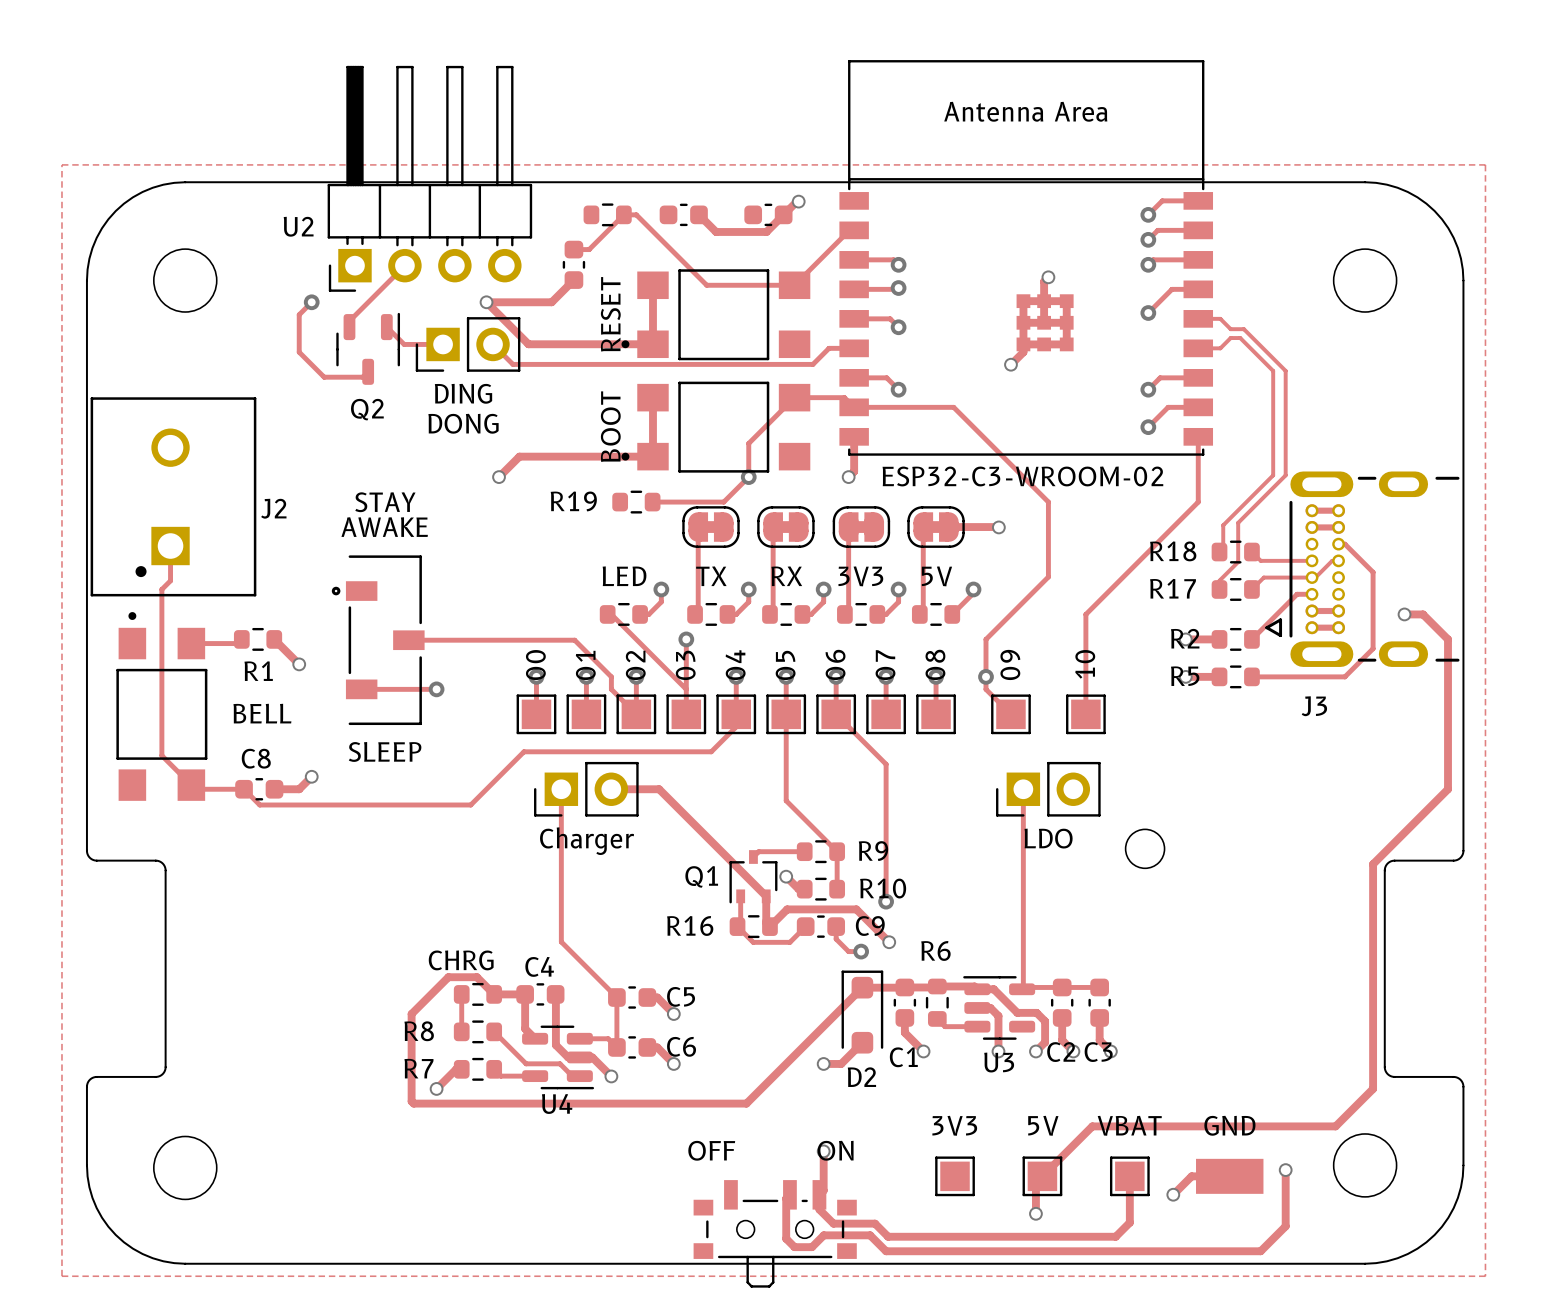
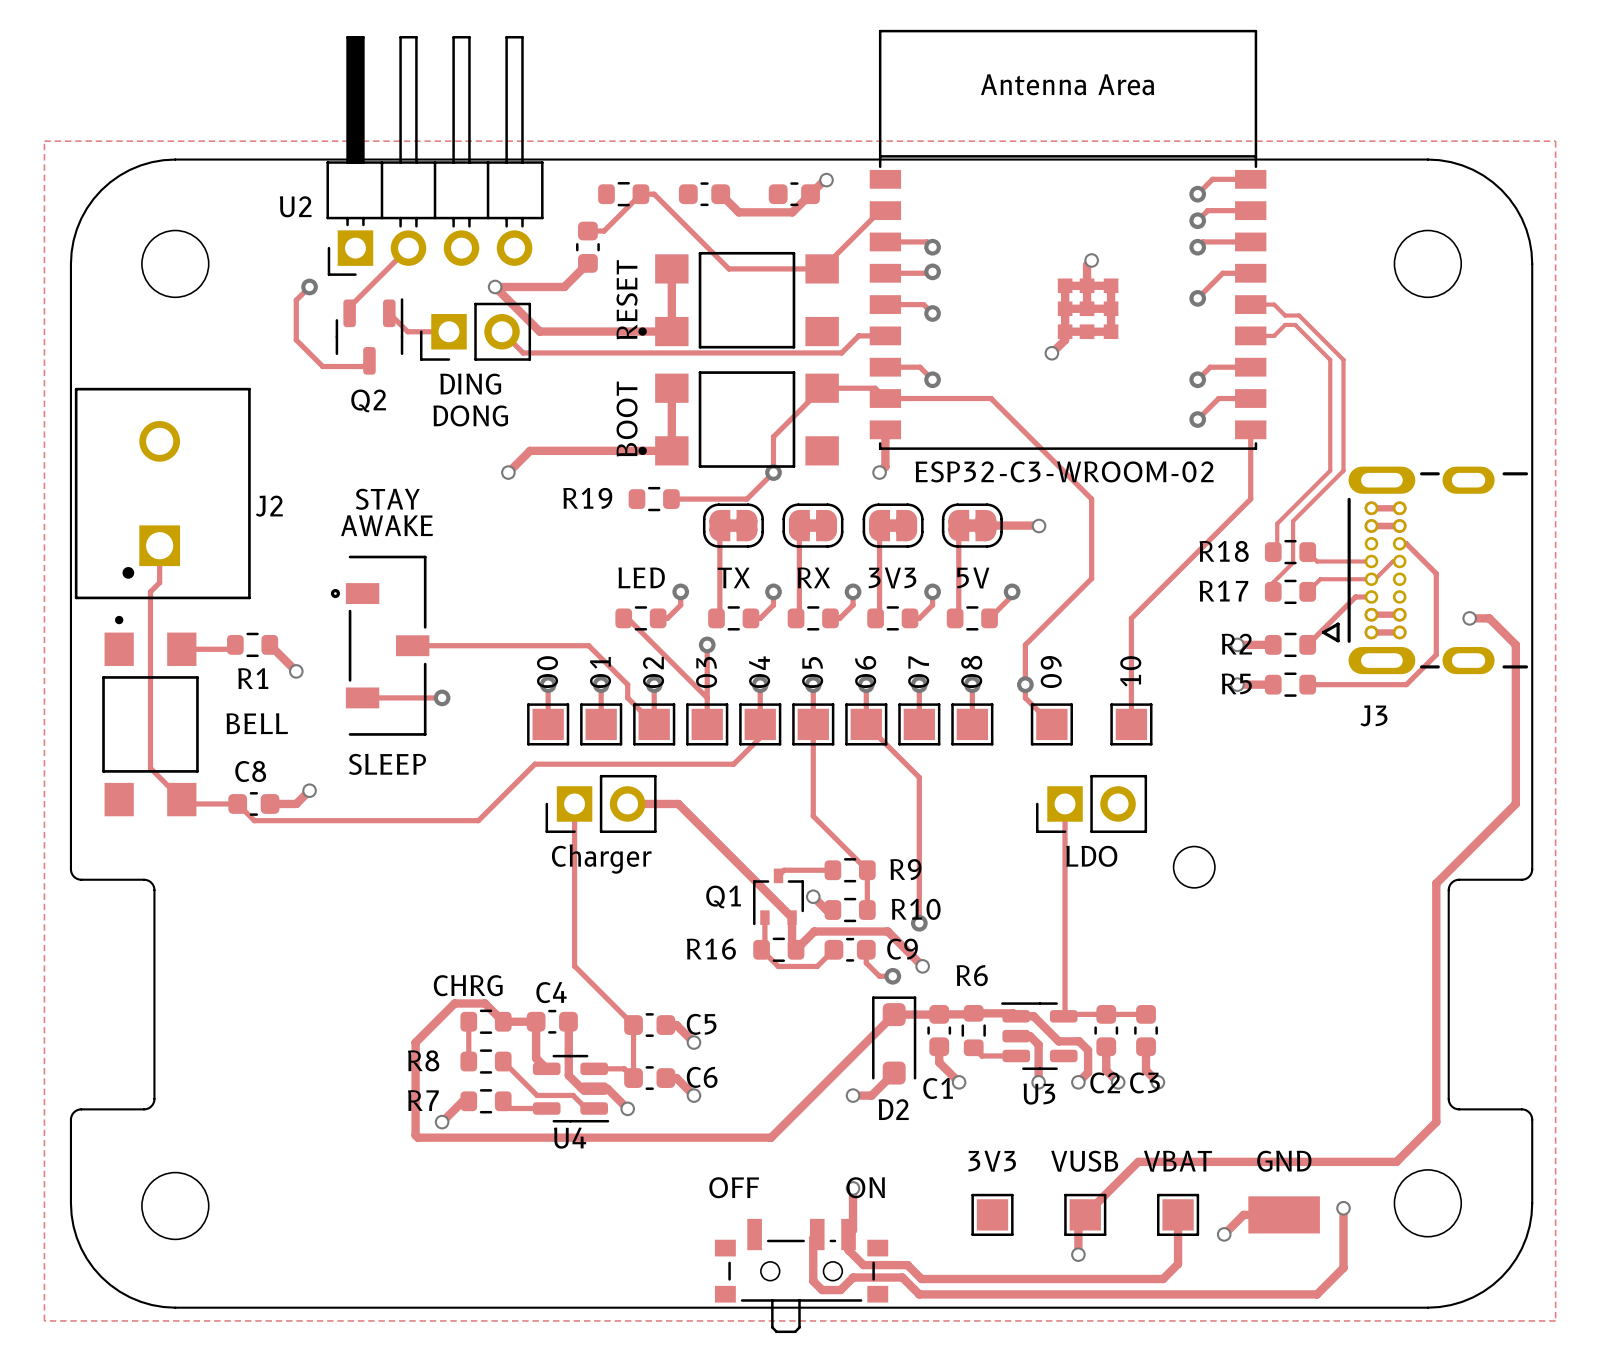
part text: 5V (1043, 1125) -> VUSB (1084, 1161)

